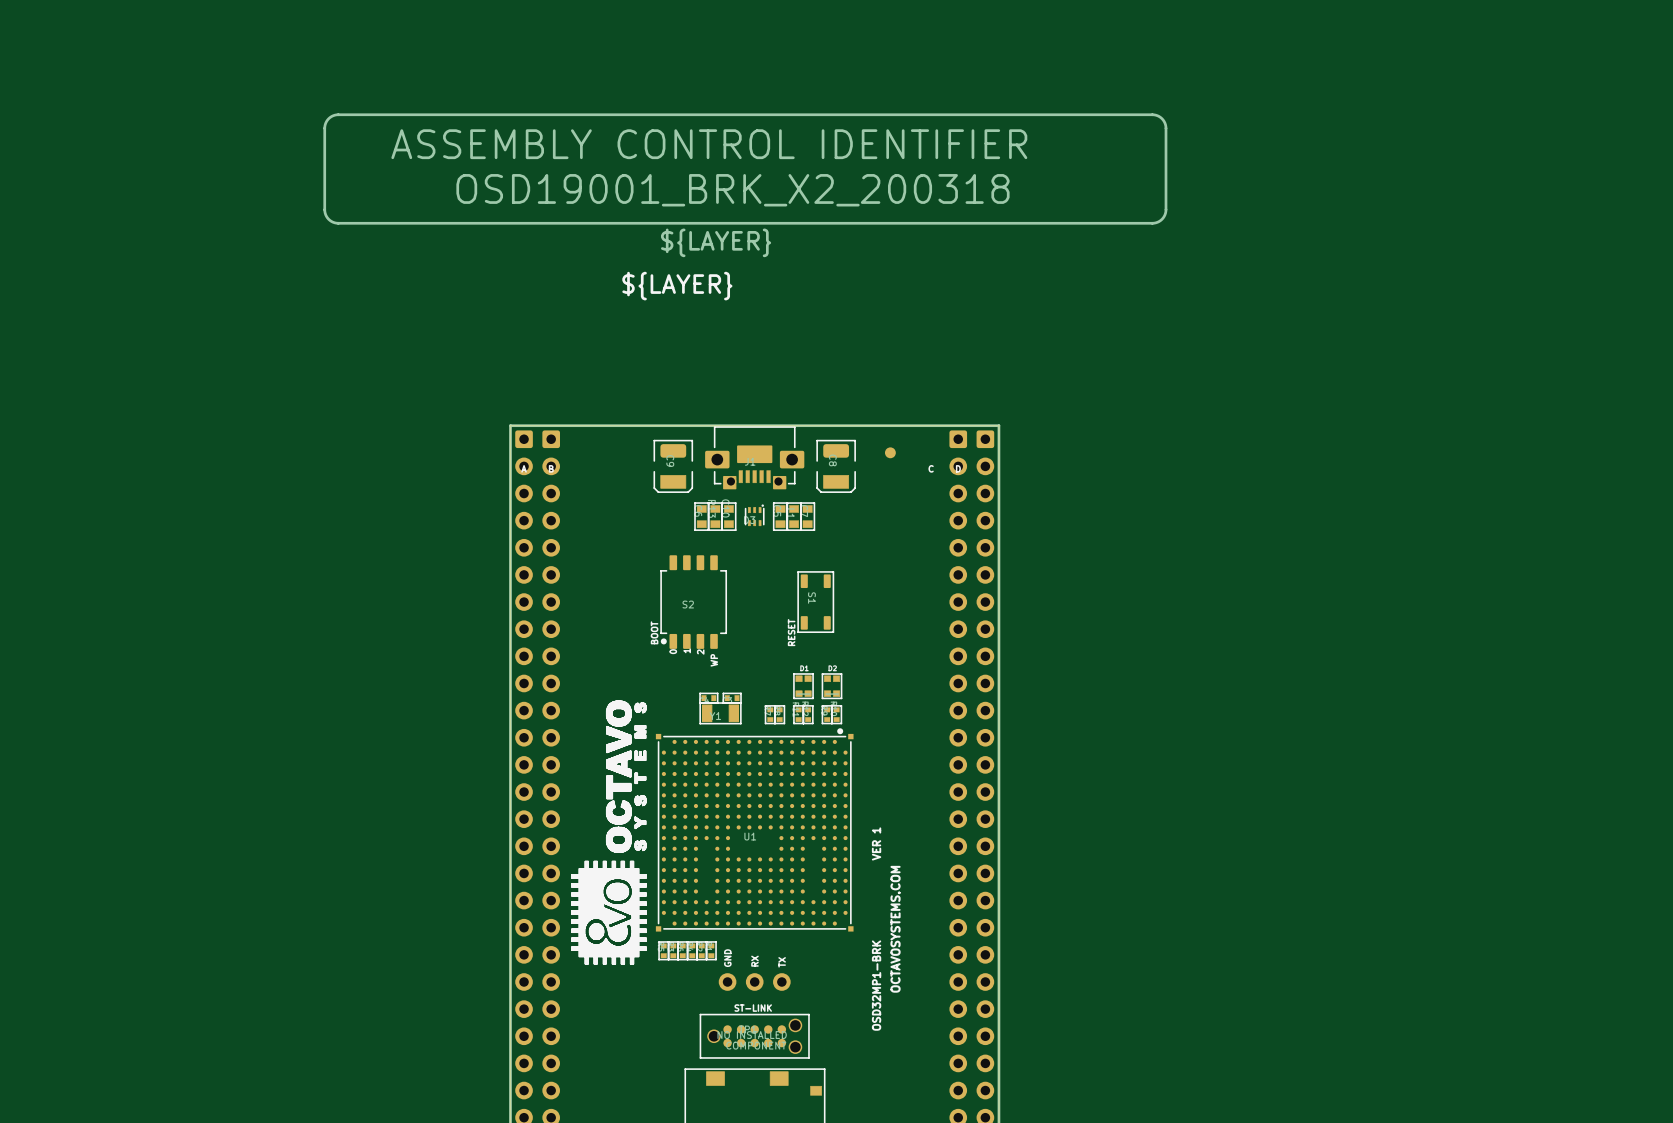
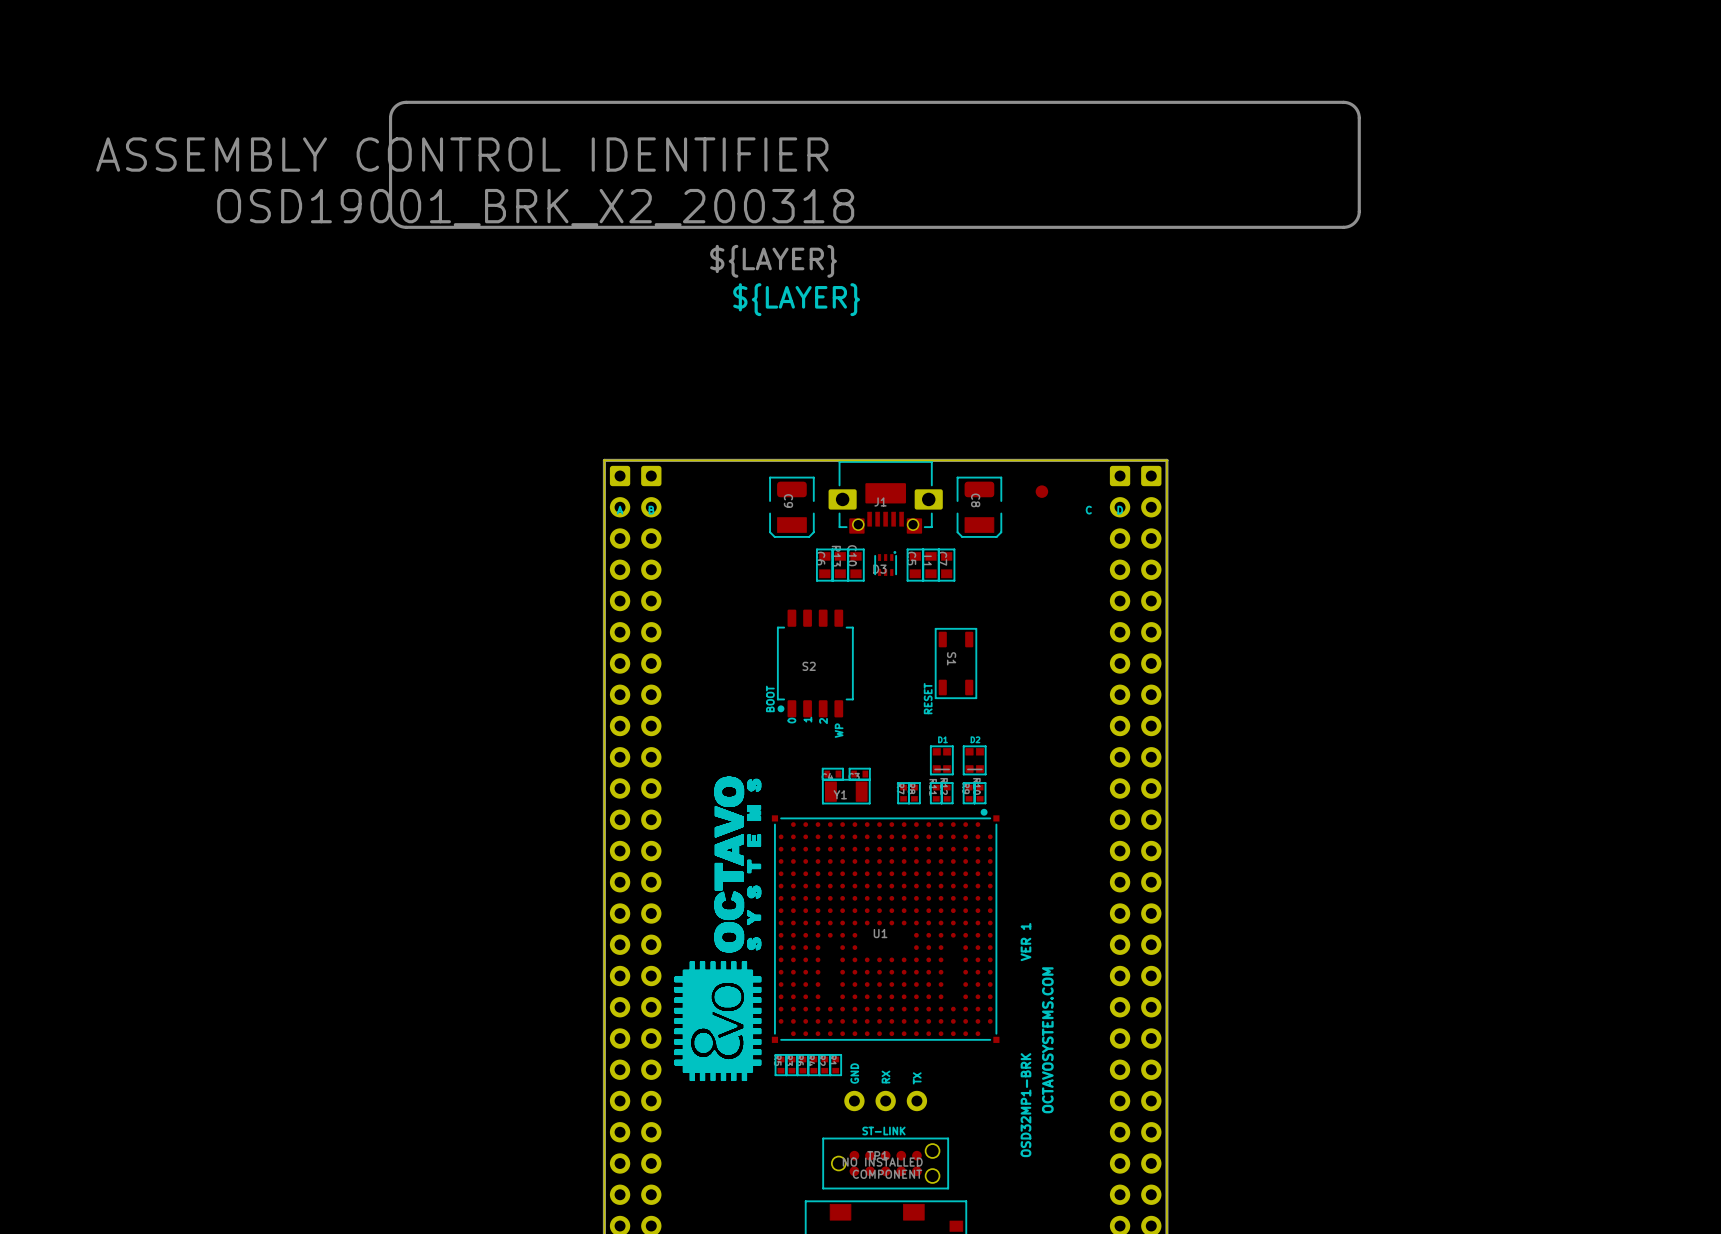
text position: ASSEMBLY CONTROL IDENTIFIER (709, 144) -> ASSEMBLY CONTROL IDENTIFIER (462, 154)
text position: OSD19001_BRK_X2_200318 (732, 190) -> OSD19001_BRK_X2_200318 (535, 207)
text position: ${LAYER} (716, 242) -> ${LAYER} (773, 261)

